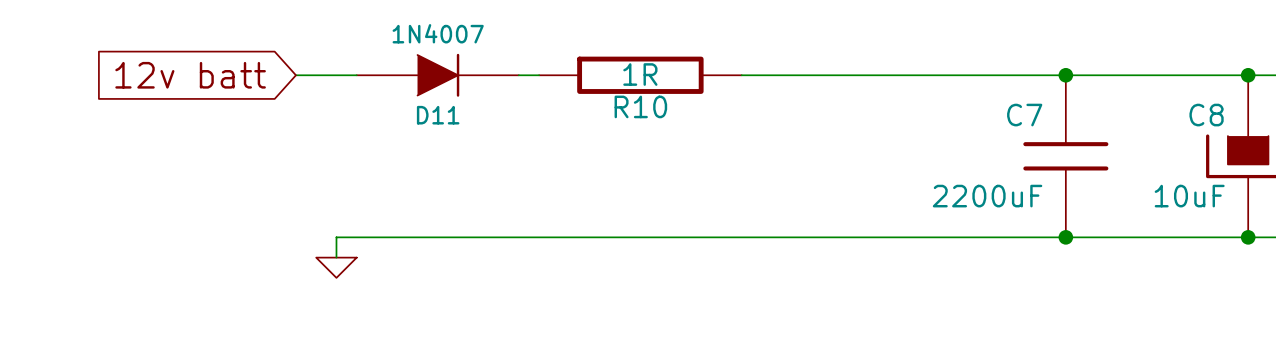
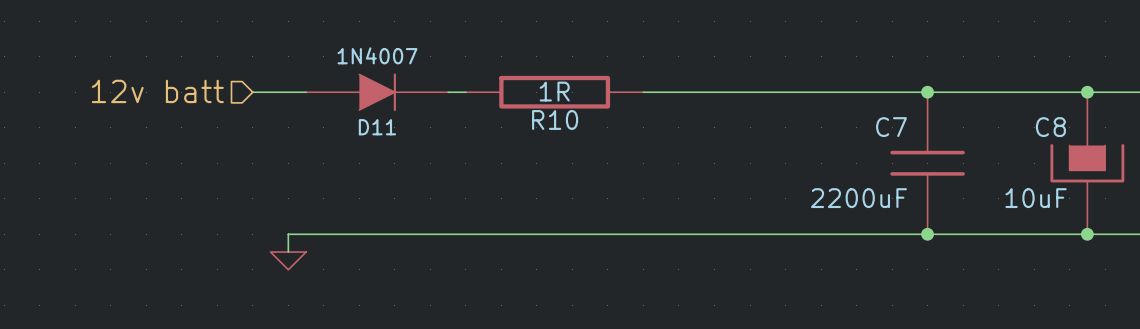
hierarchical label: none -> 12v batt (157, 91)
global label: 12v batt (190, 75) -> none

